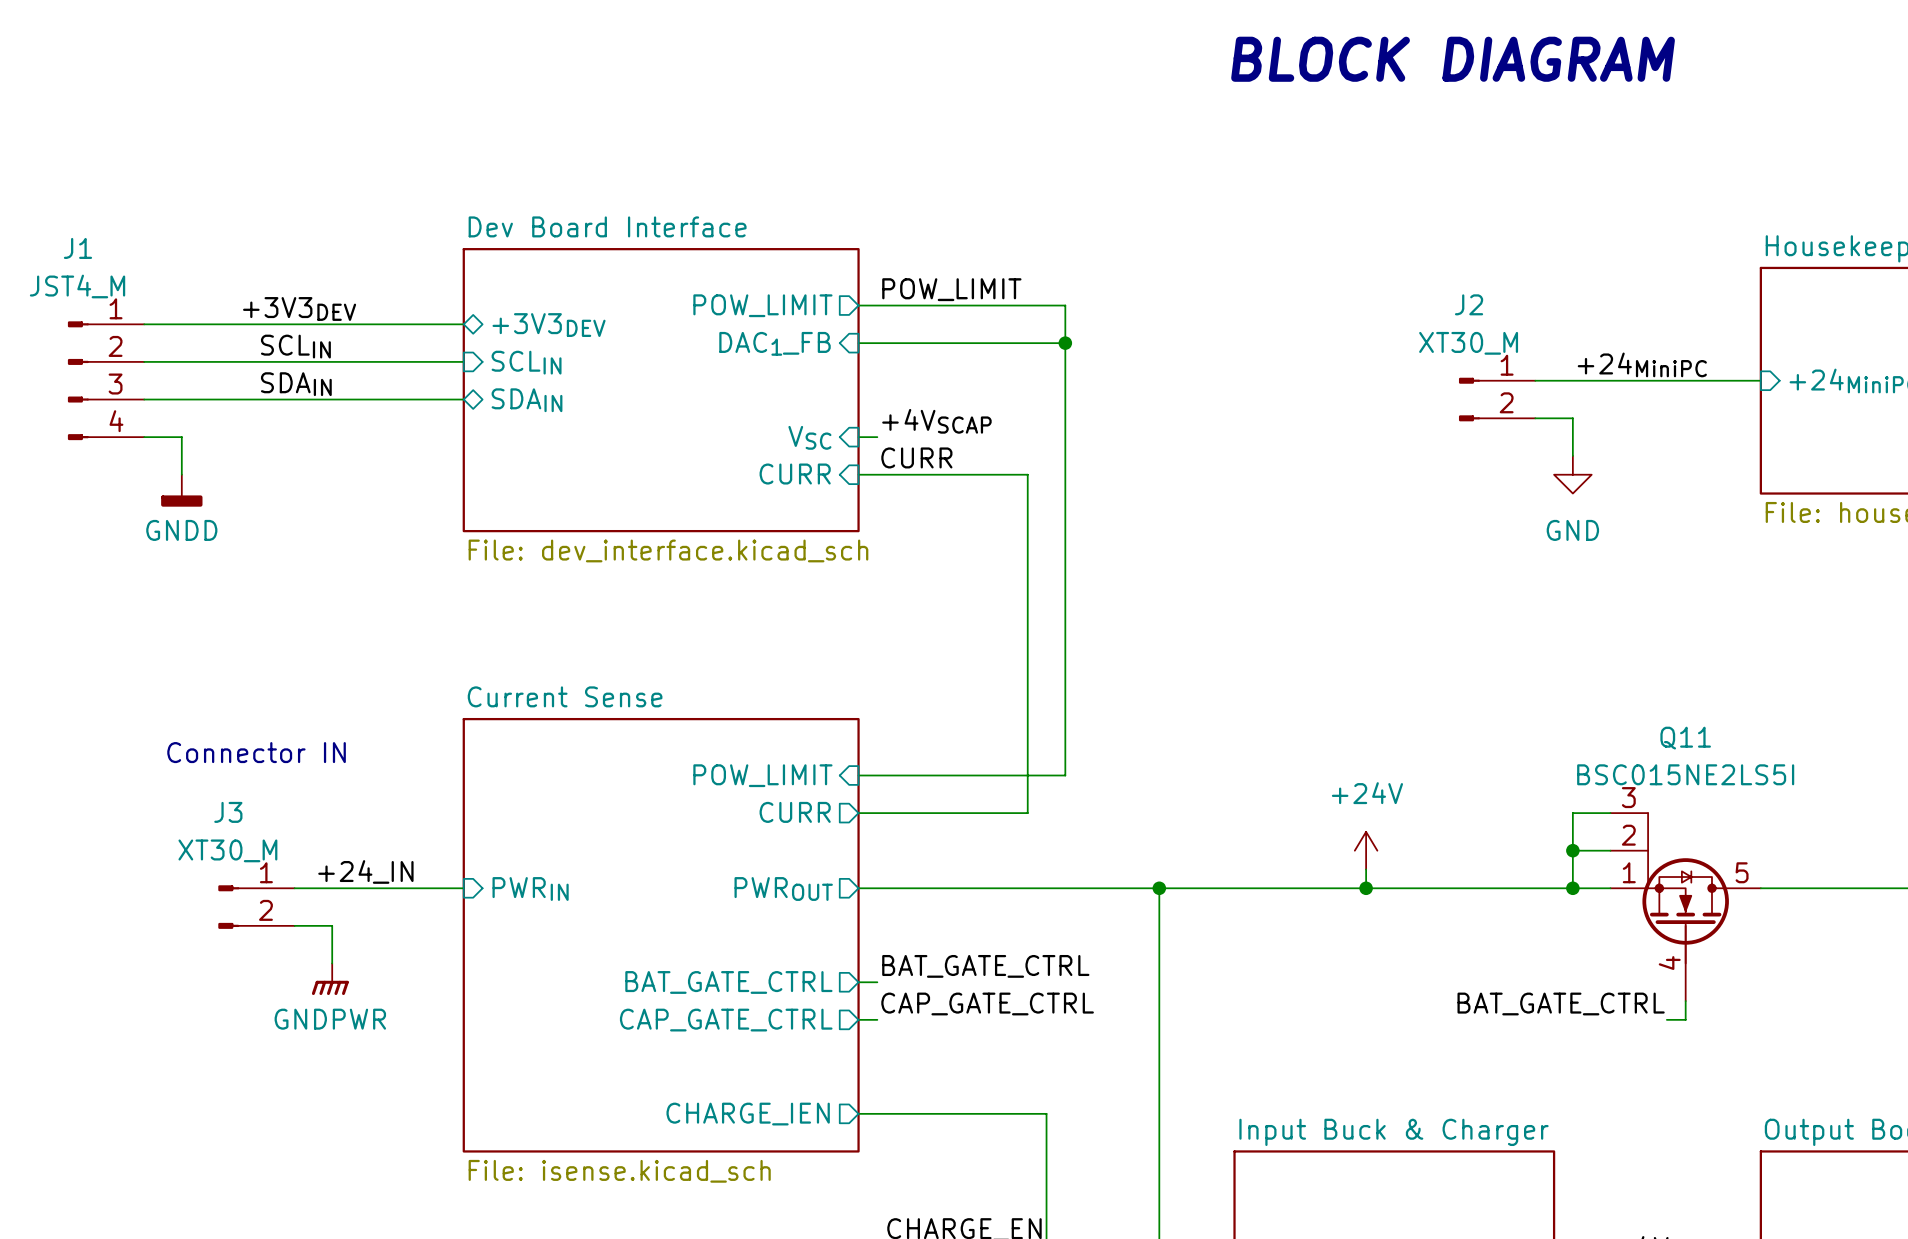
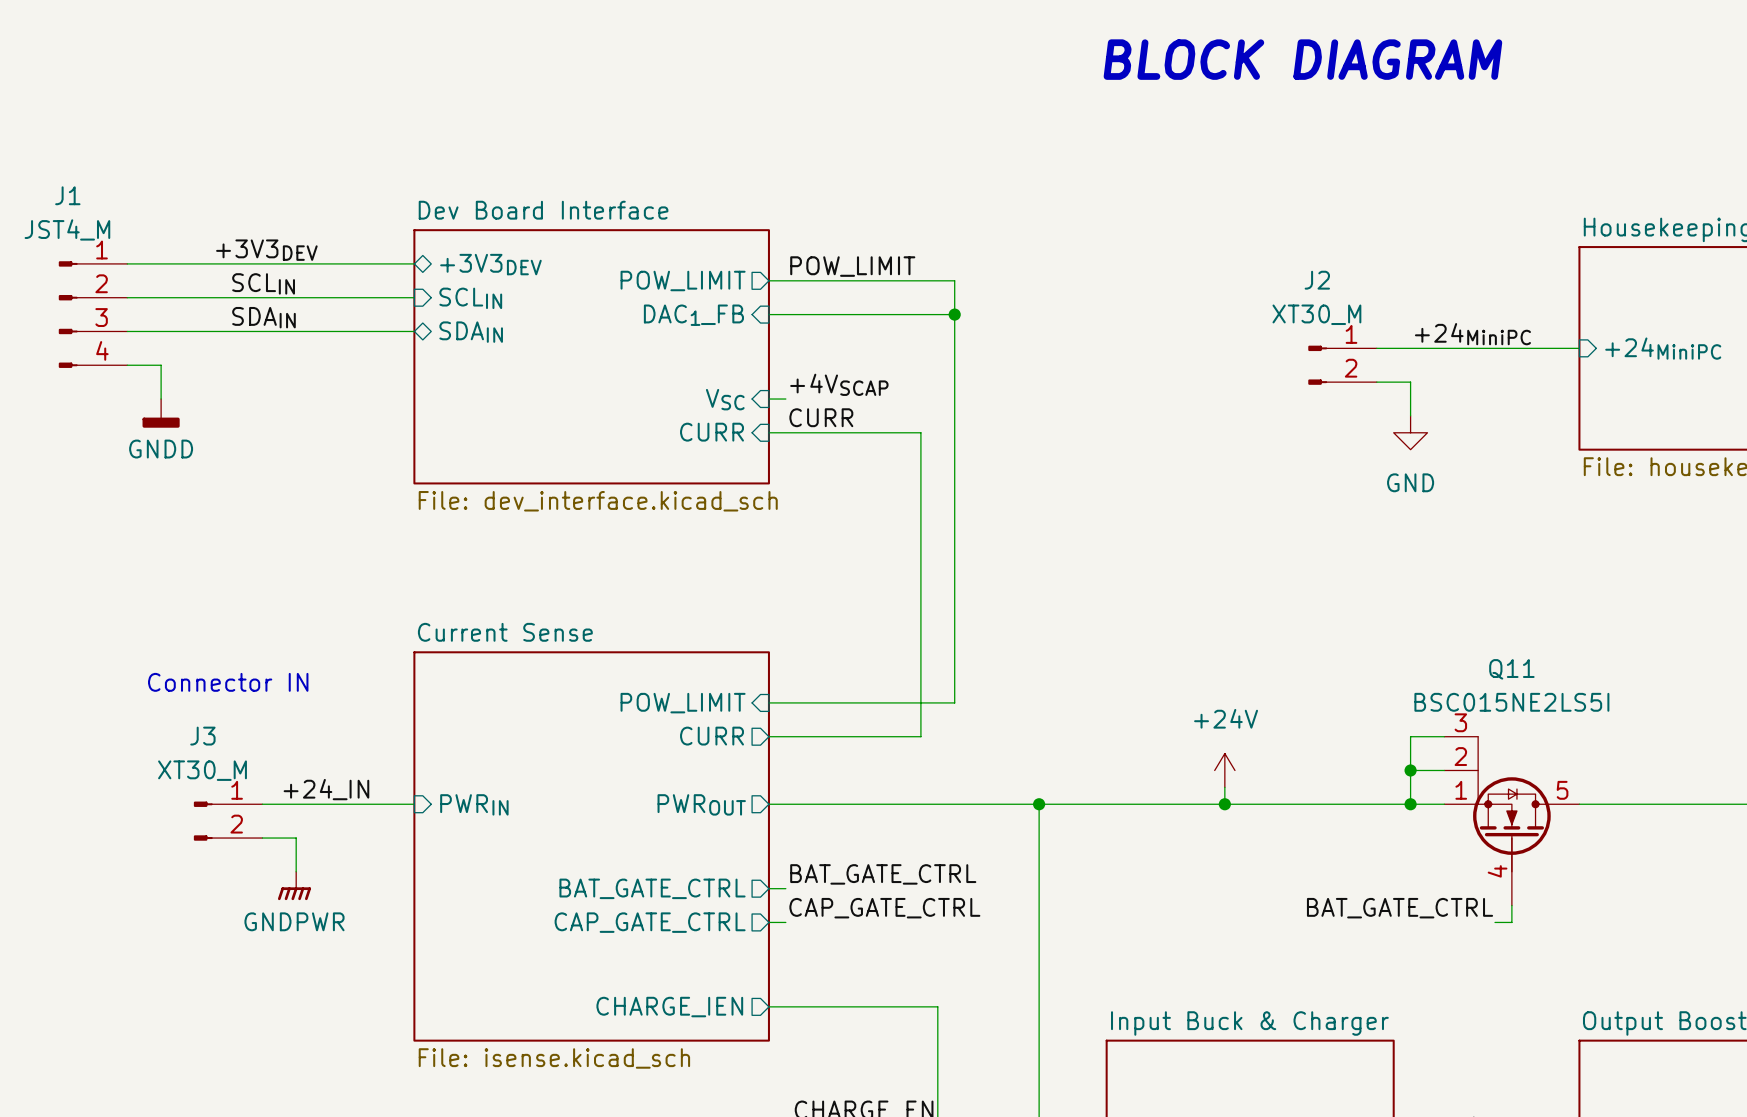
wire: none -> (127, 263) (414, 263)
sheet pin: none -> +3V3DEV (490, 264)
label: none -> SCLIN (263, 283)
label position: +3V3DEV (299, 308) -> +3V3DEV (266, 250)
sheet pin shape: bidirectional (549, 325) -> input (470, 298)
sheet pin: +3V3DEV (549, 325) -> SCLIN (470, 298)
label: SCLIN (295, 346) -> SDAIN (263, 317)
sheet pin shape: input (526, 362) -> bidirectional (471, 332)
sheet pin: SCLIN (526, 362) -> SDAIN (471, 332)
J1 position: (106, 380) -> (93, 314)
label: SDAIN (296, 384) -> none
wire: (181, 399) (463, 399) -> (161, 365) (161, 399)
sheet pin: SDAIN (527, 400) -> none
wire: (144, 437) (181, 437) (181, 474) -> none
power symbol position: GNDD (181, 490) -> GNDD (161, 413)

